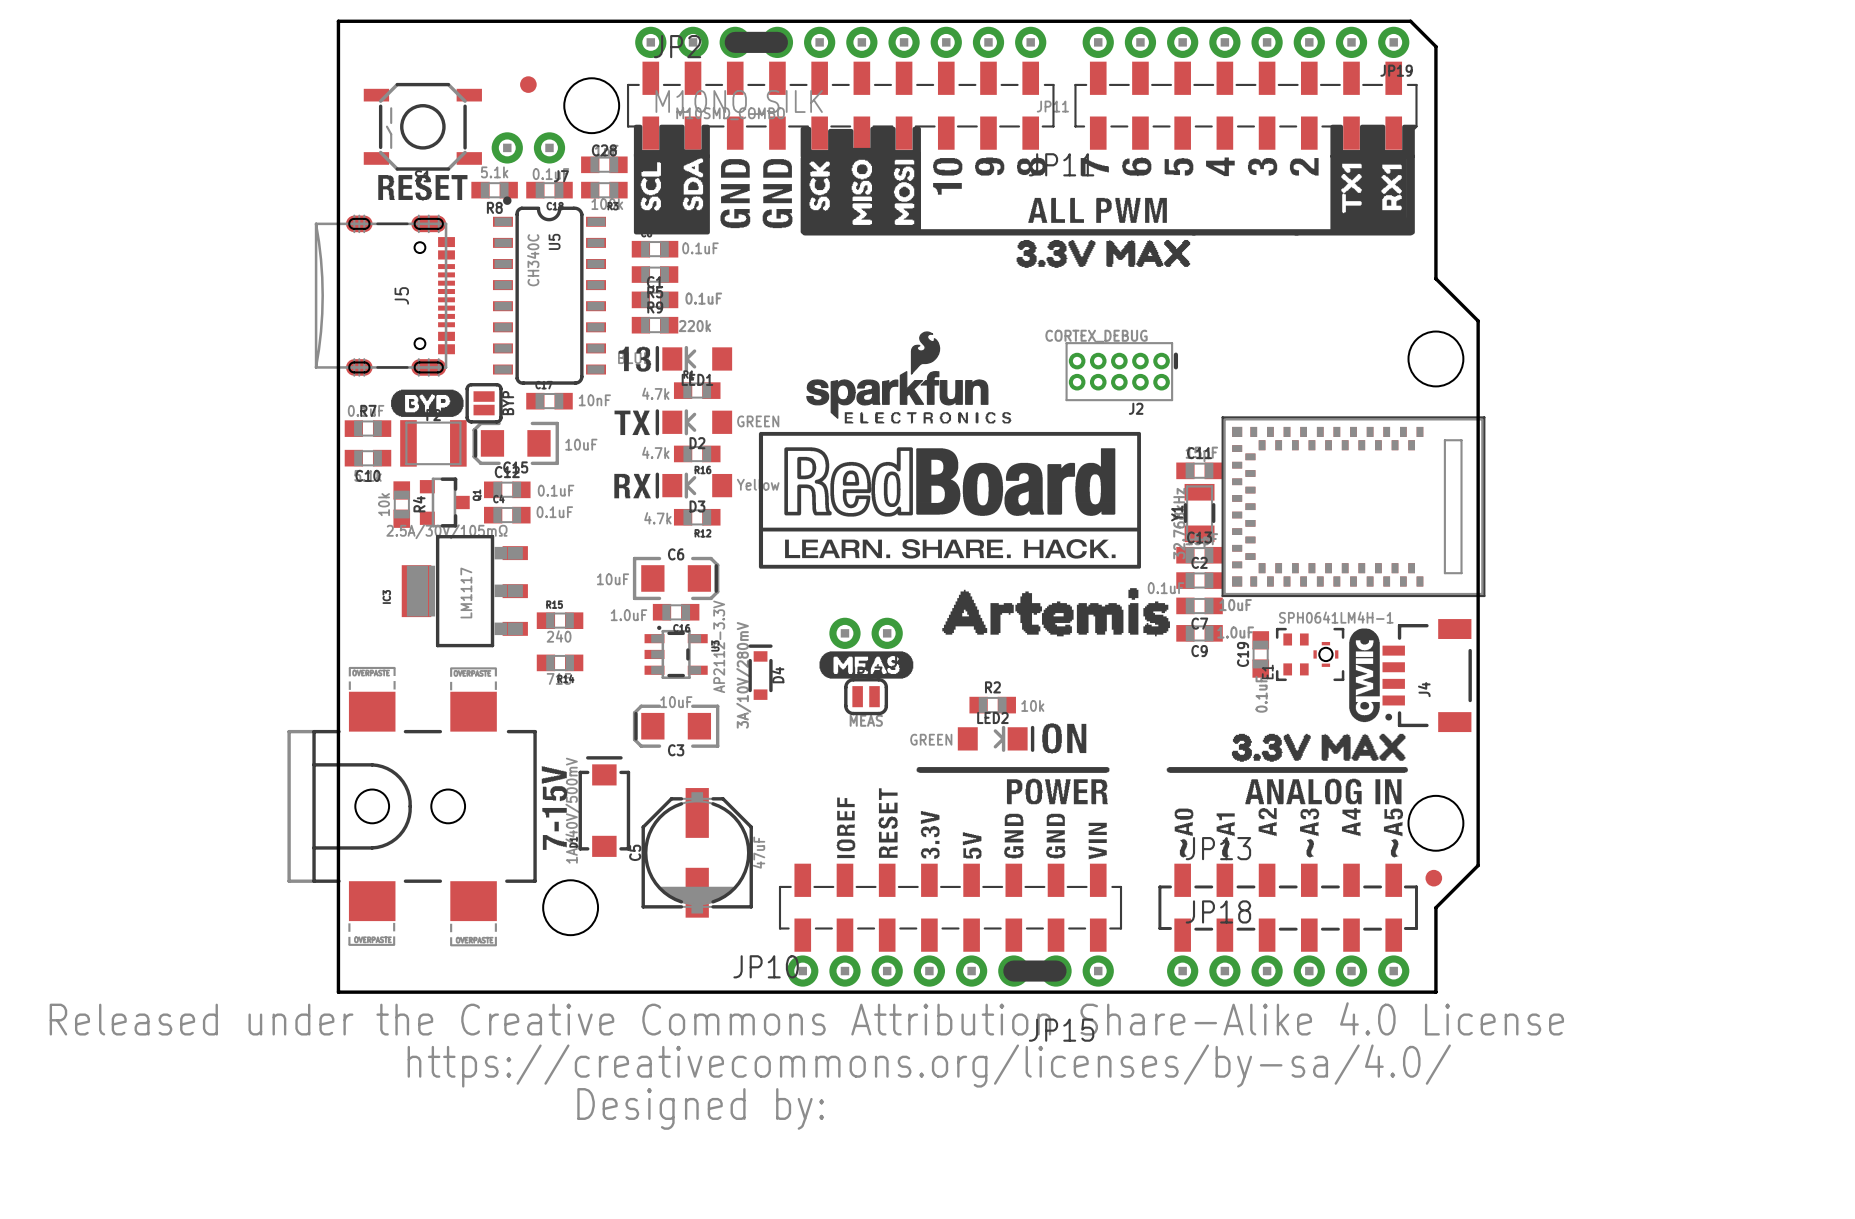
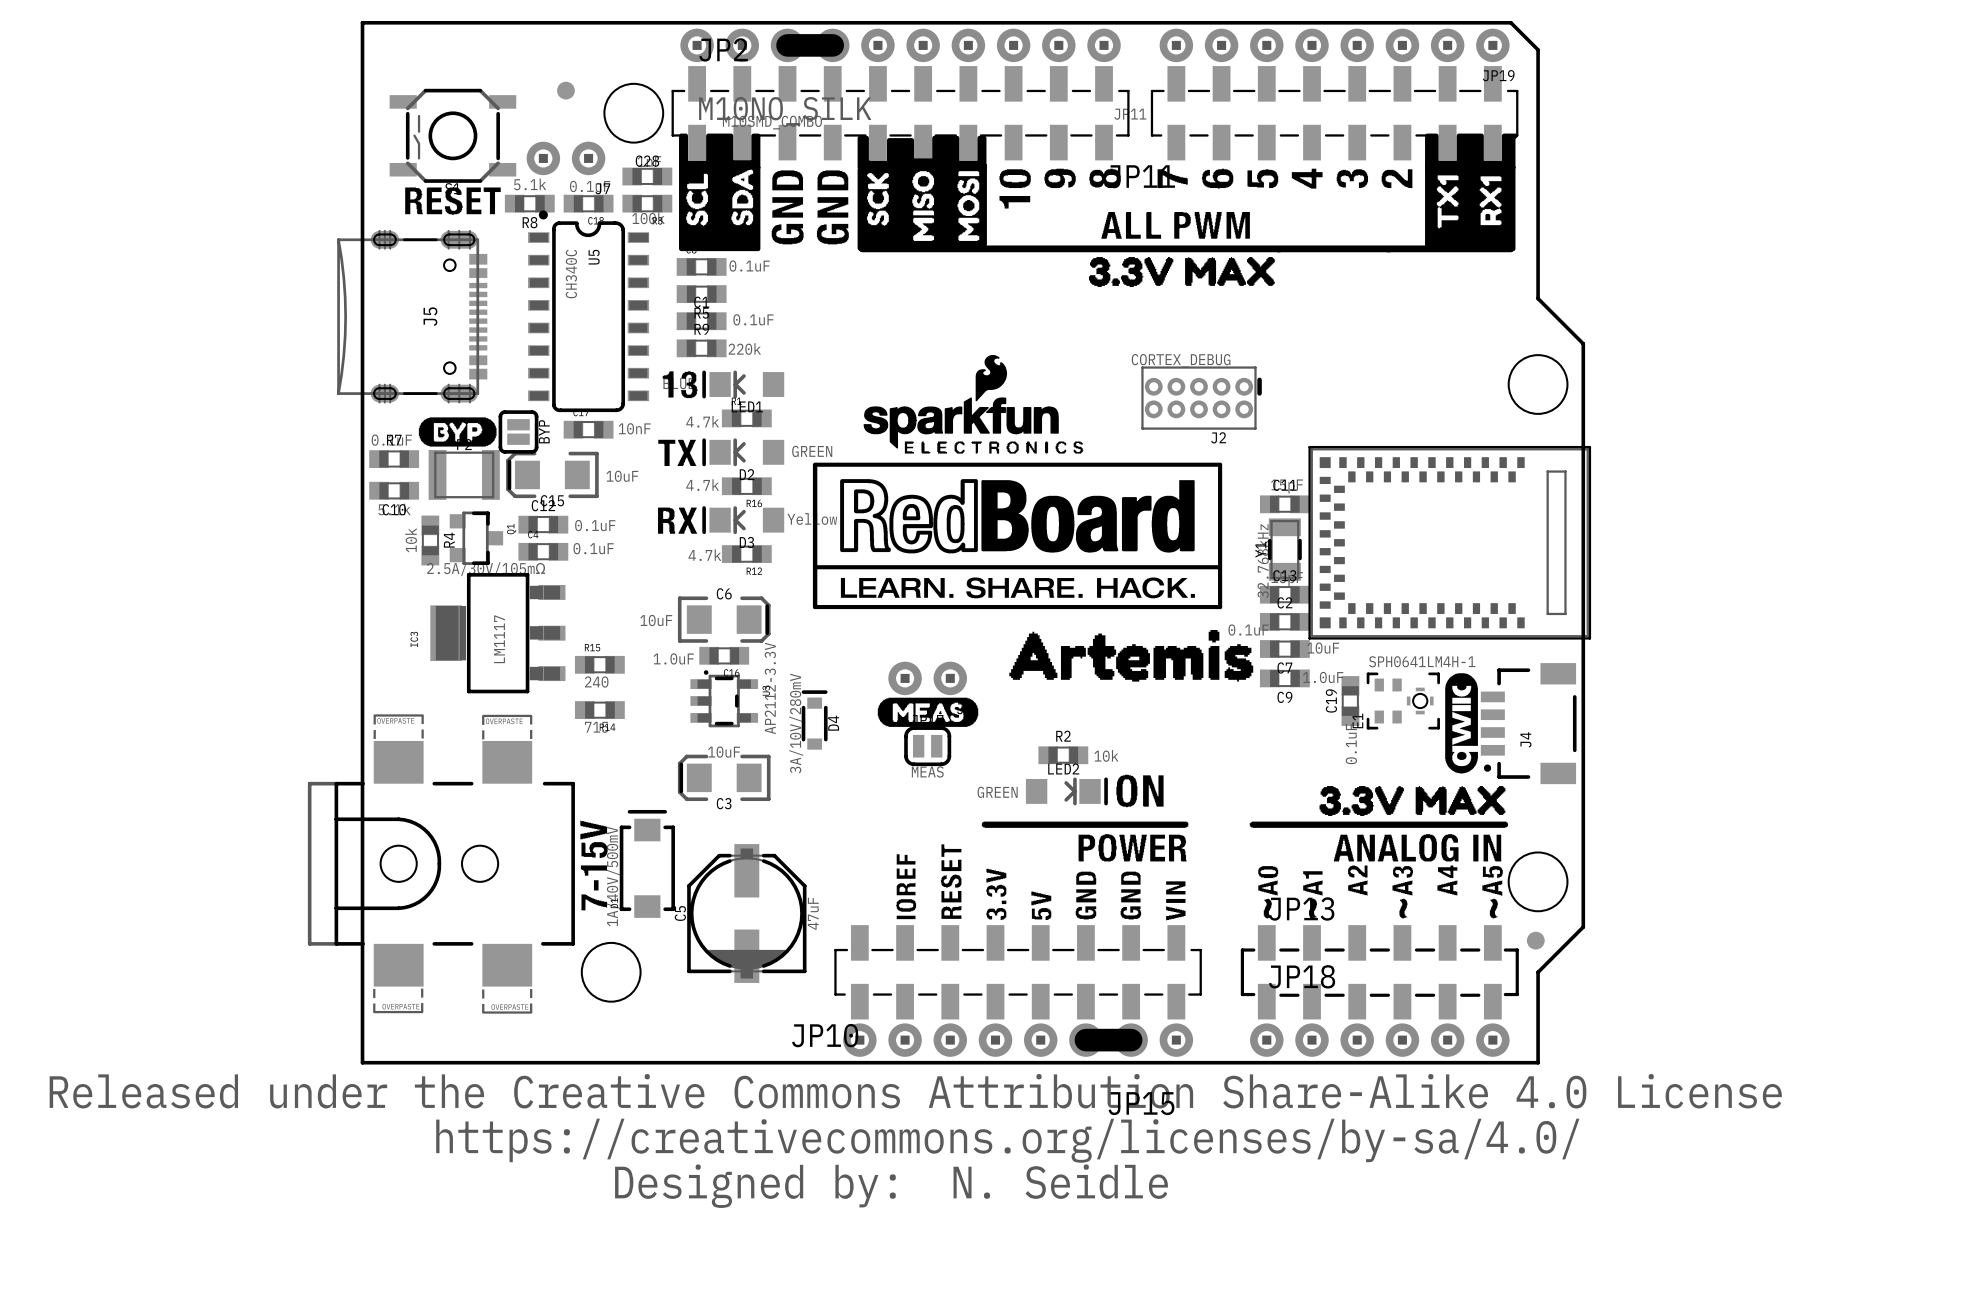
text: none -> N. Seidle (1060, 1181)

